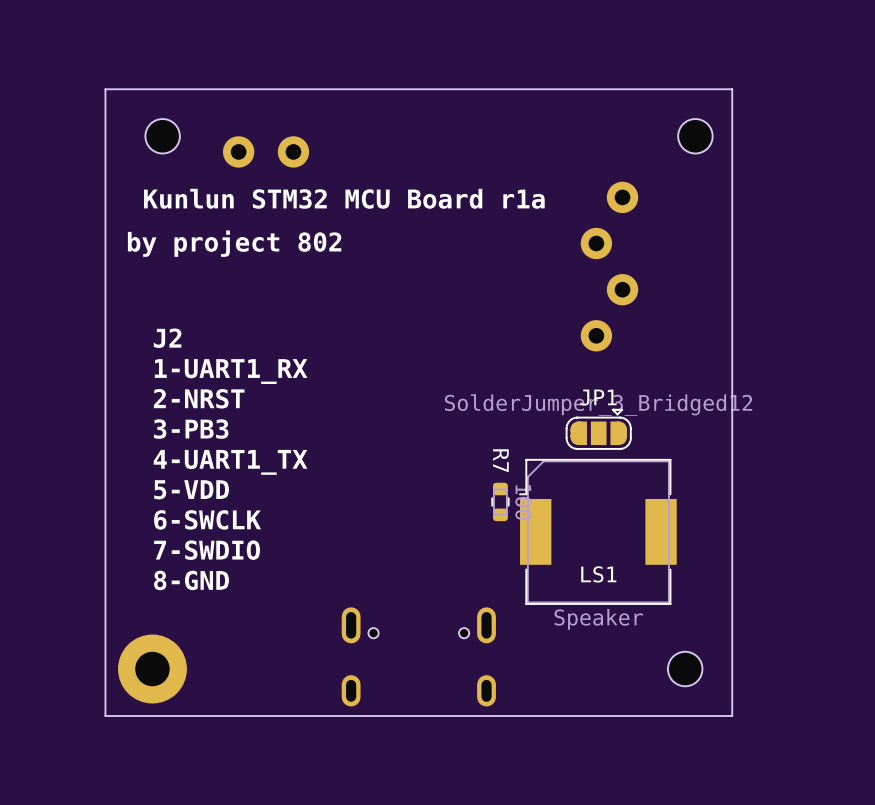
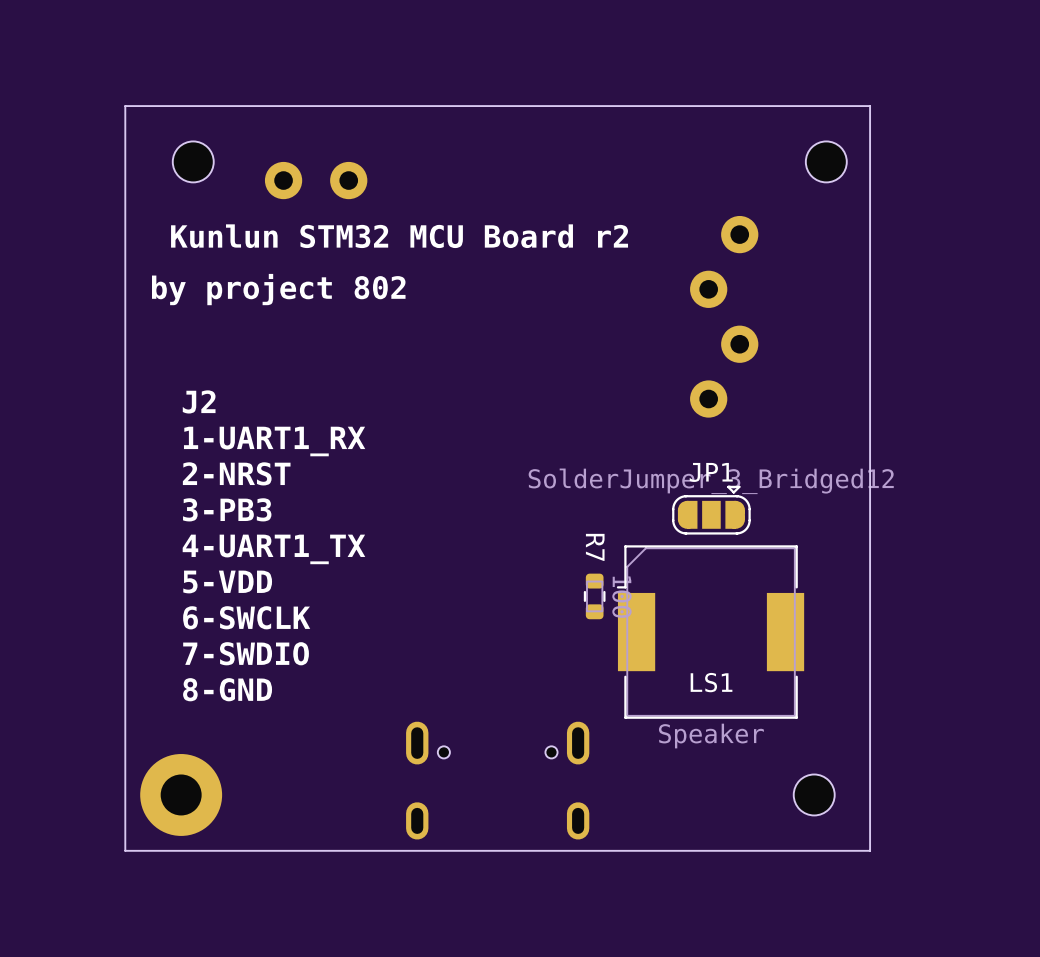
text: Kunlun STM32 MCU Board r1a (344, 198) -> Kunlun STM32 MCU Board r2 (399, 236)

